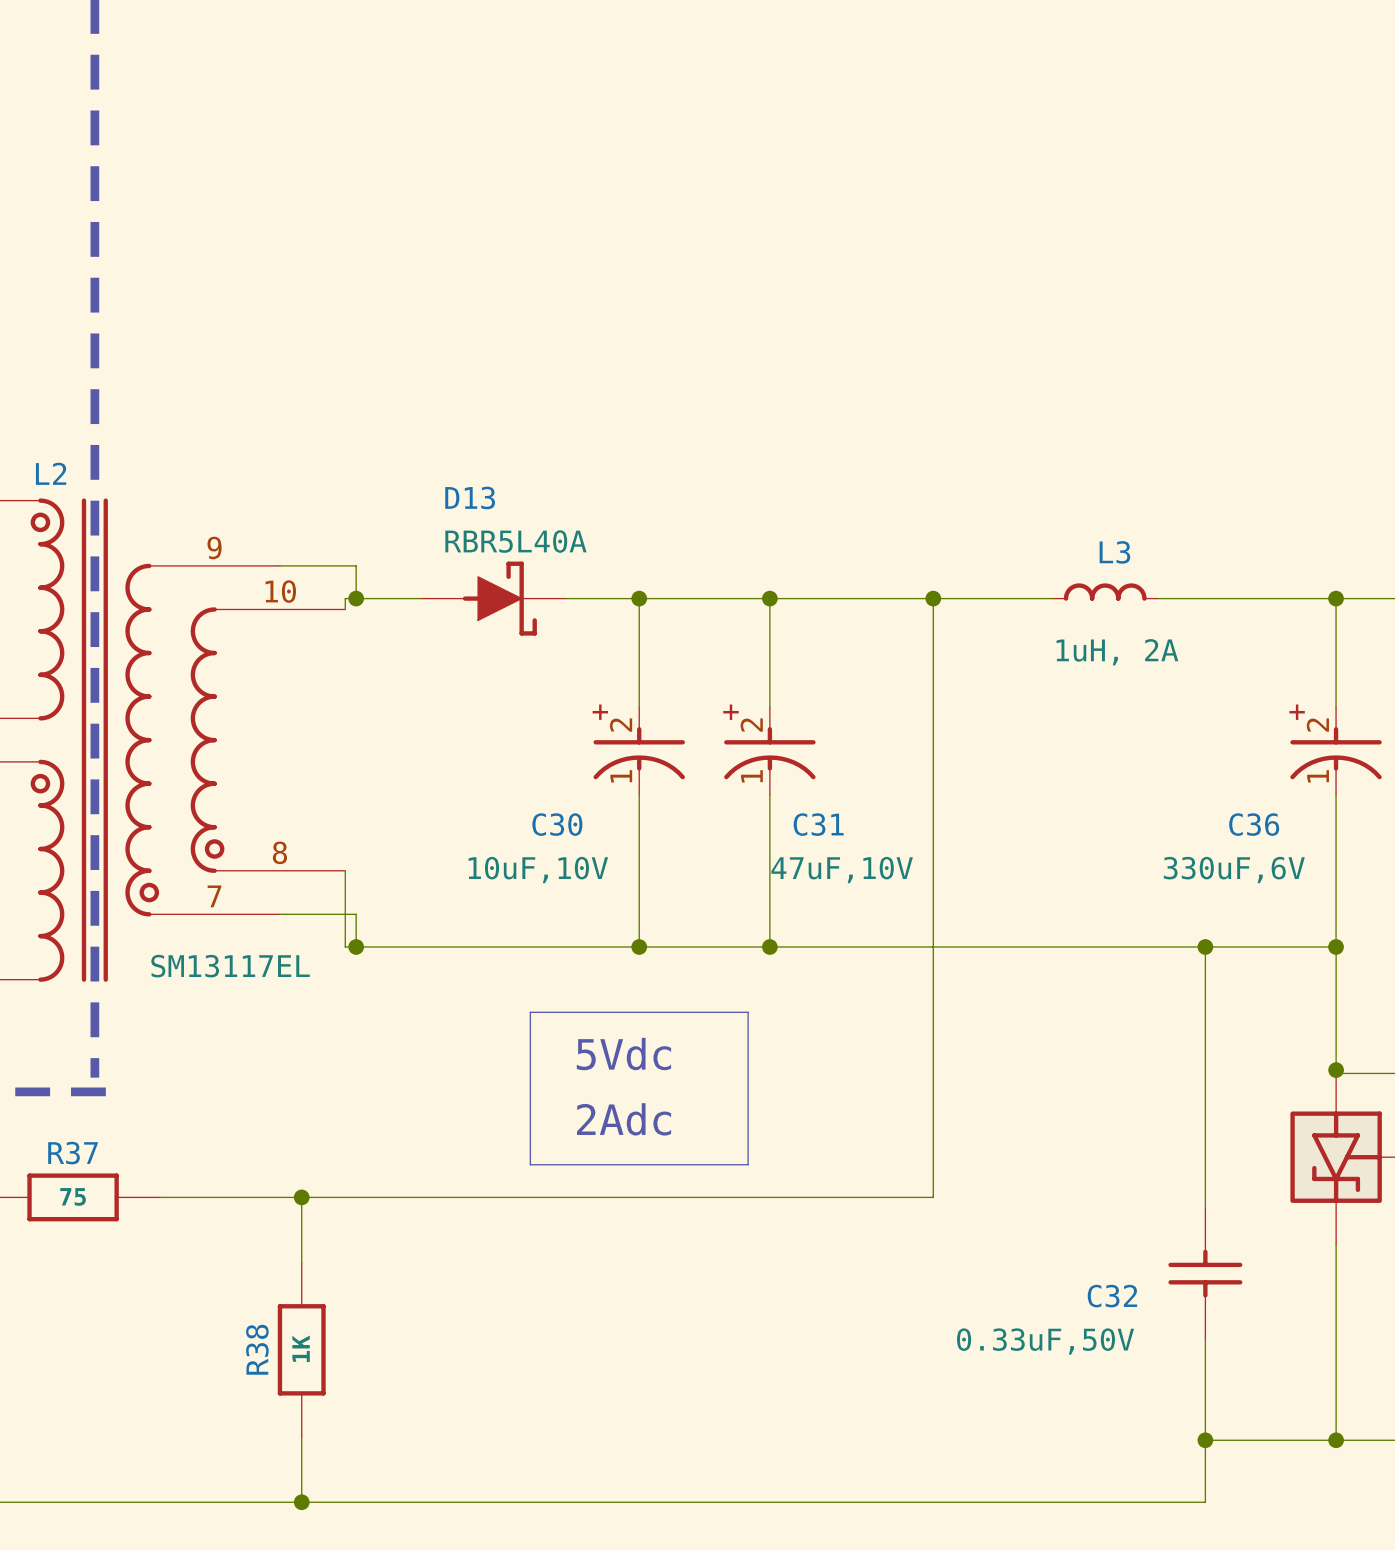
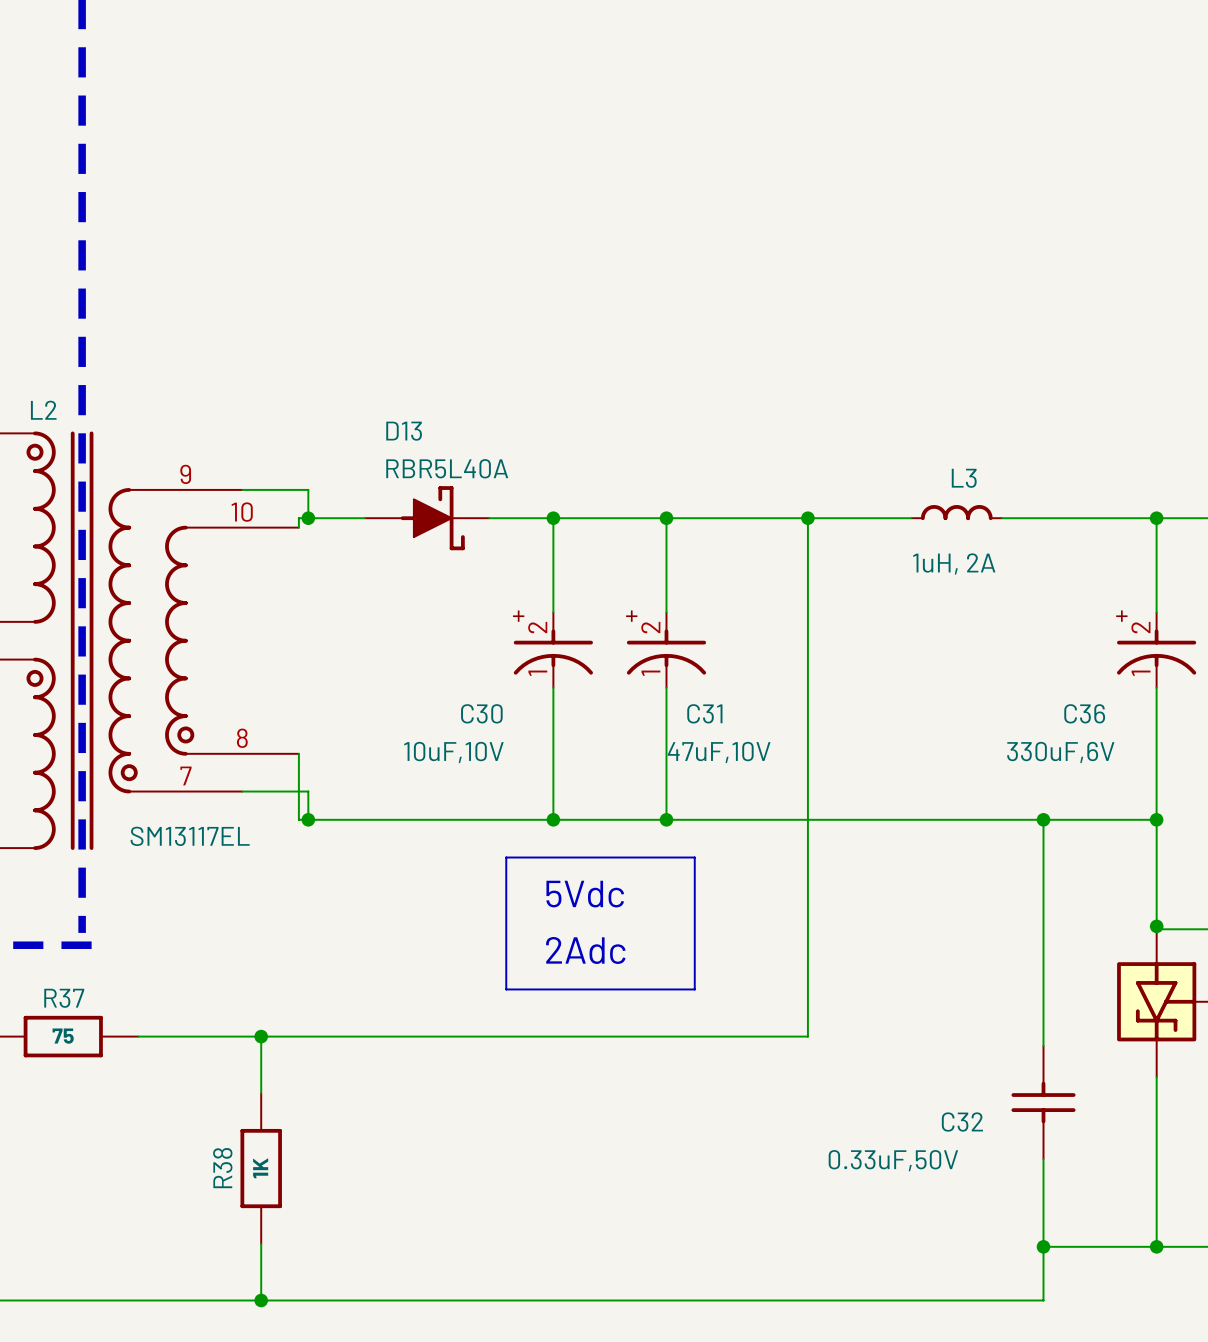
line: (530, 1012) (748, 1012) (748, 1164) (530, 1164) (530, 1012) -> (506, 857) (694, 857) (694, 989) (506, 989) (506, 857)
text position: 5Vdc (623, 1054) -> 5Vdc (585, 894)
text position: 2Adc (624, 1119) -> 2Adc (585, 950)

